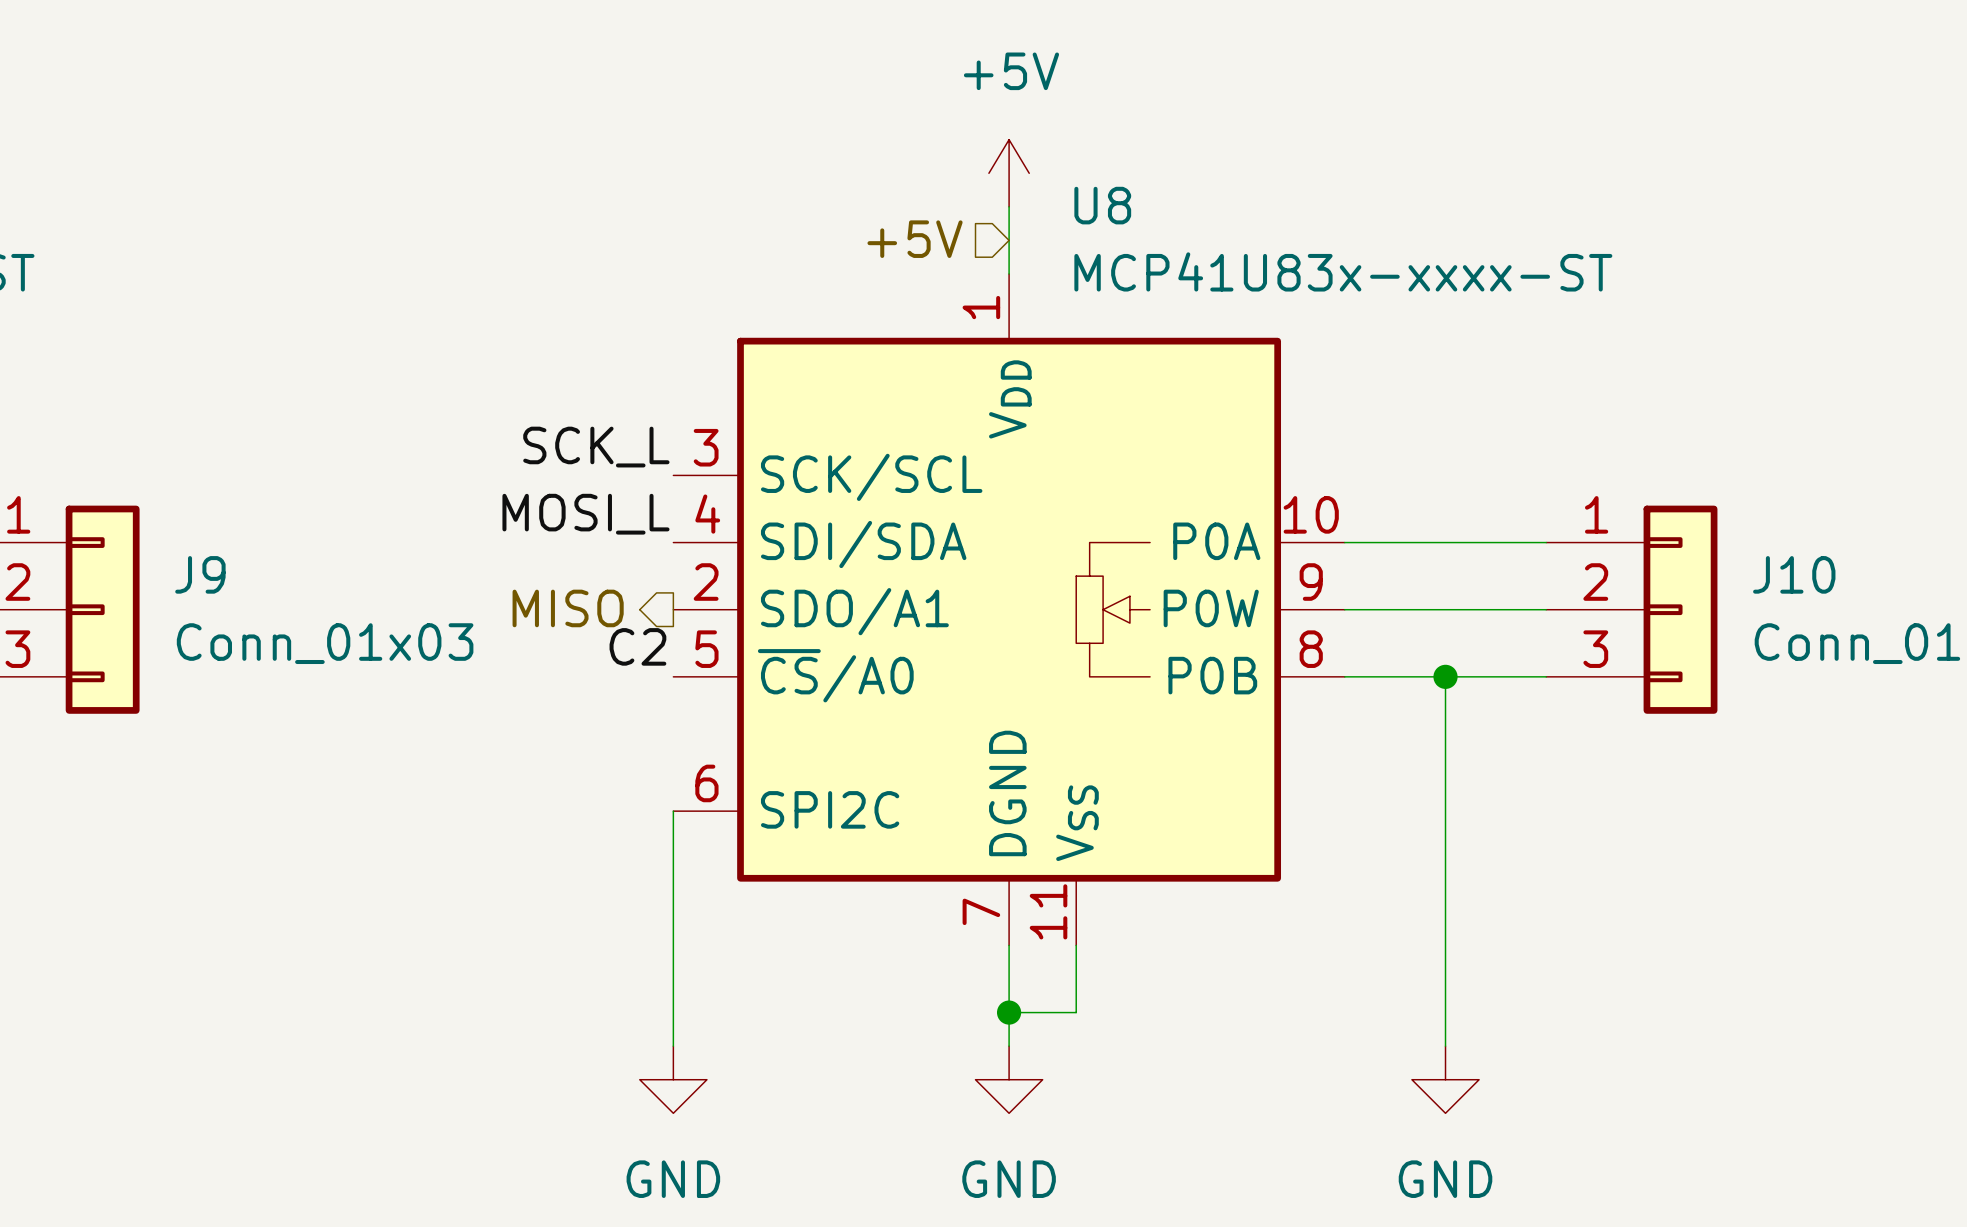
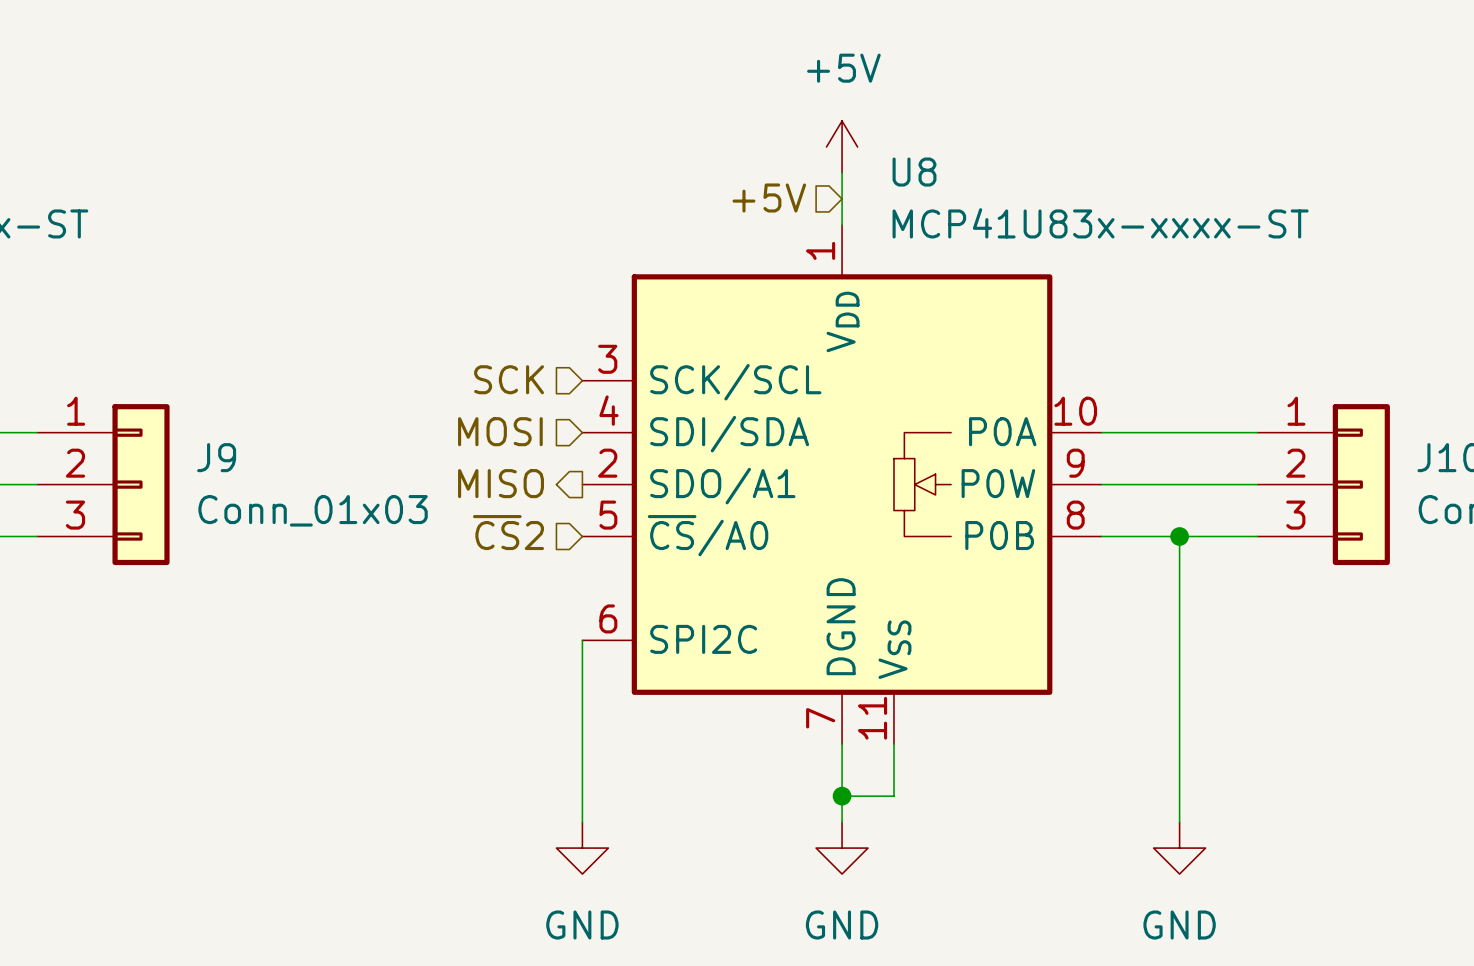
label: SCK_L (596, 447) -> none
hierarchical label: none -> SCK (509, 379)
label: MOSI_L (585, 514) -> none
hierarchical label: none -> MOSI (500, 431)
label: C2 (637, 646) -> none
hierarchical label: none -> ~{CS}2 (508, 532)

